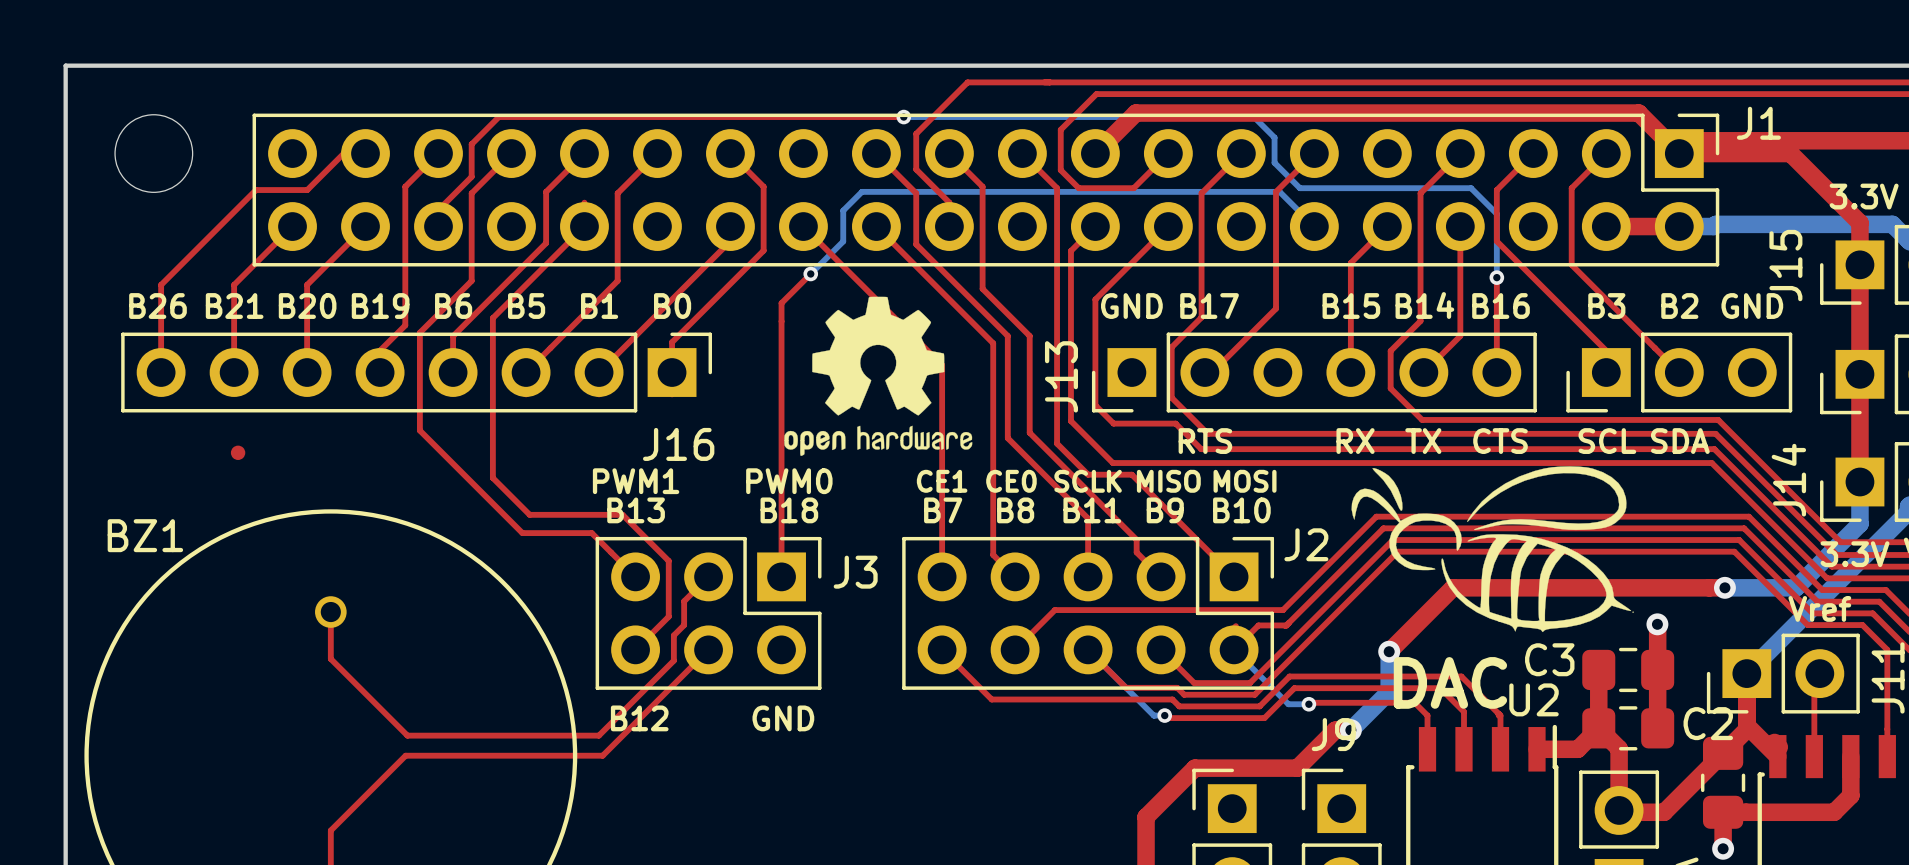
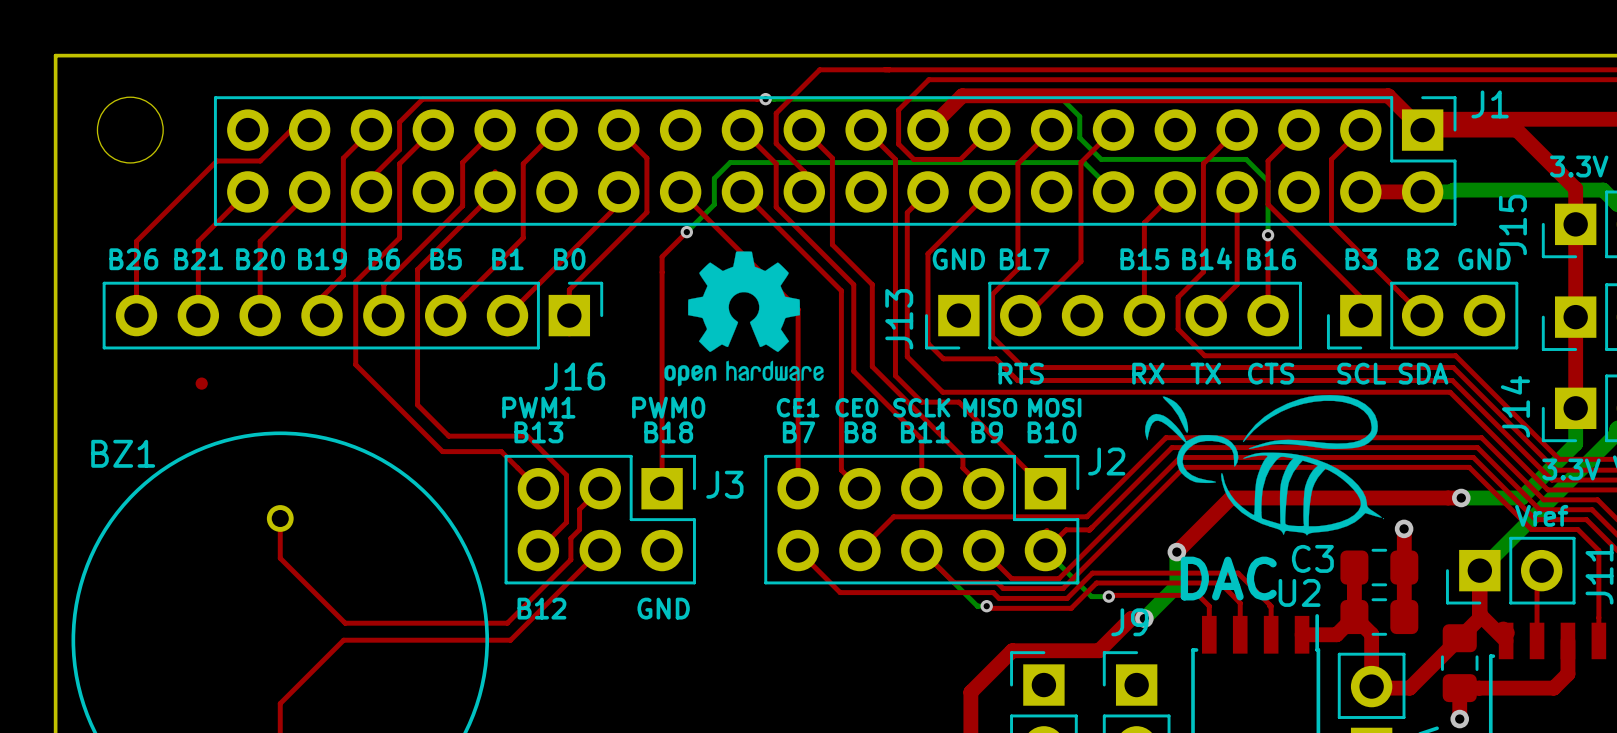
C2 name: C2 (1708, 723) -> none

